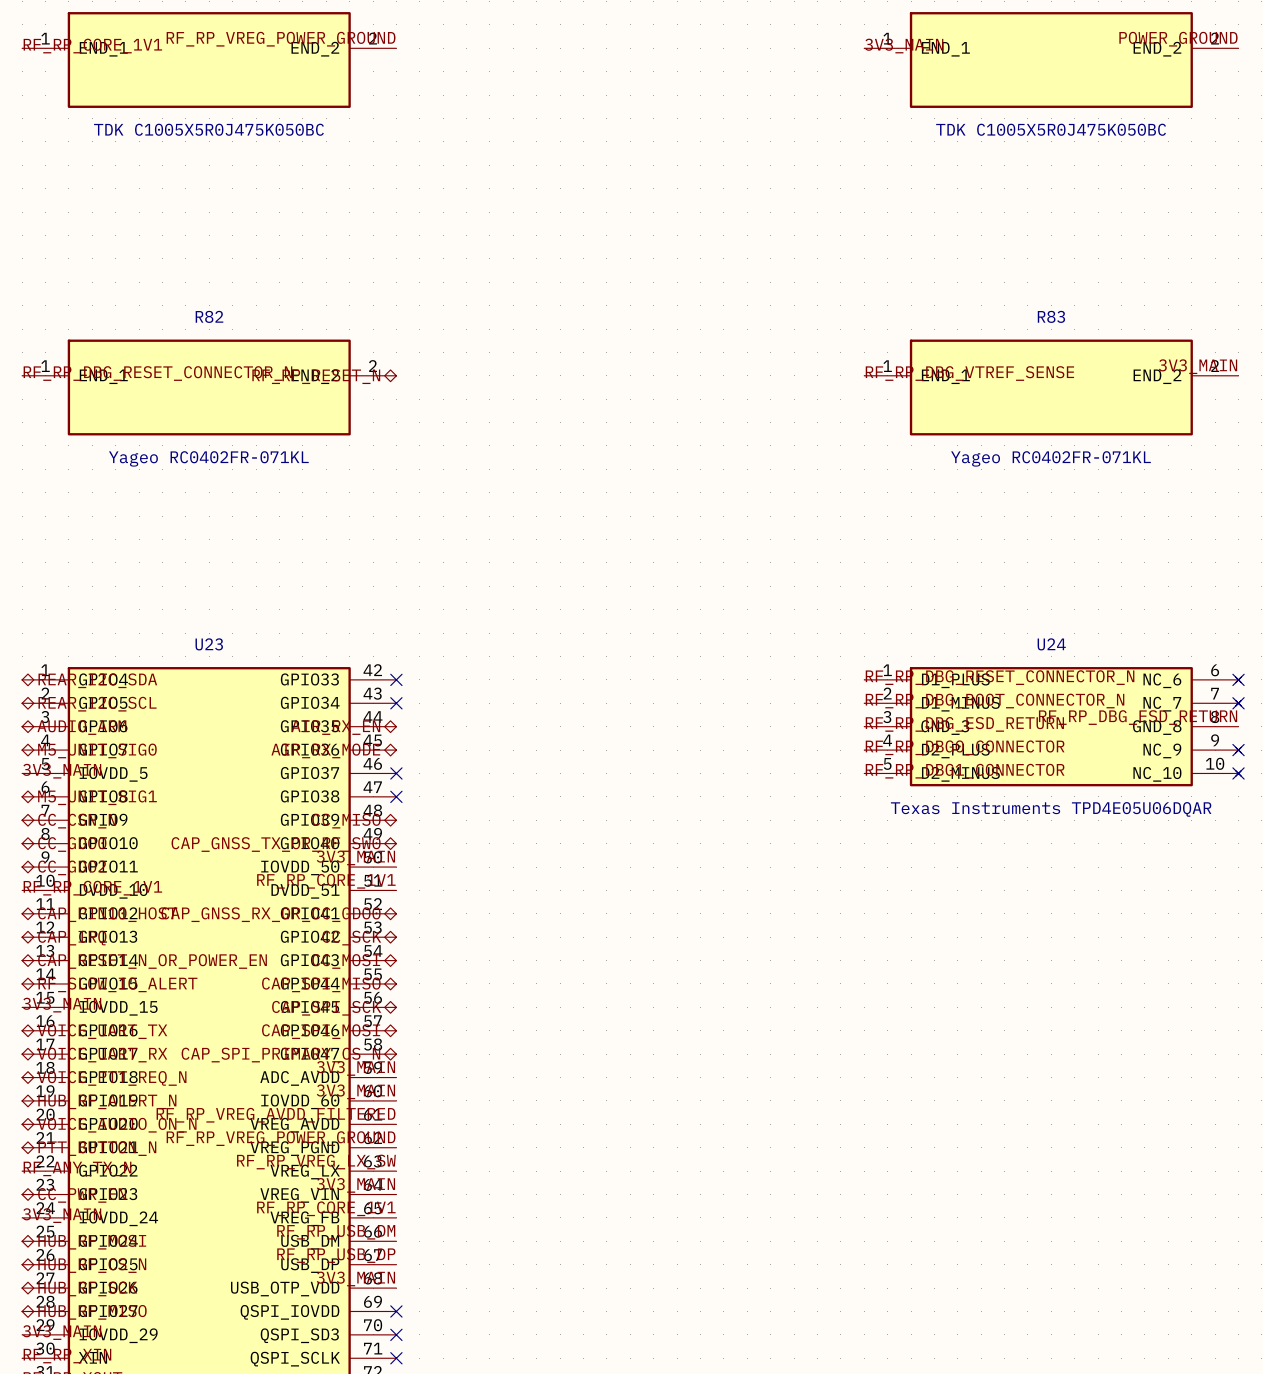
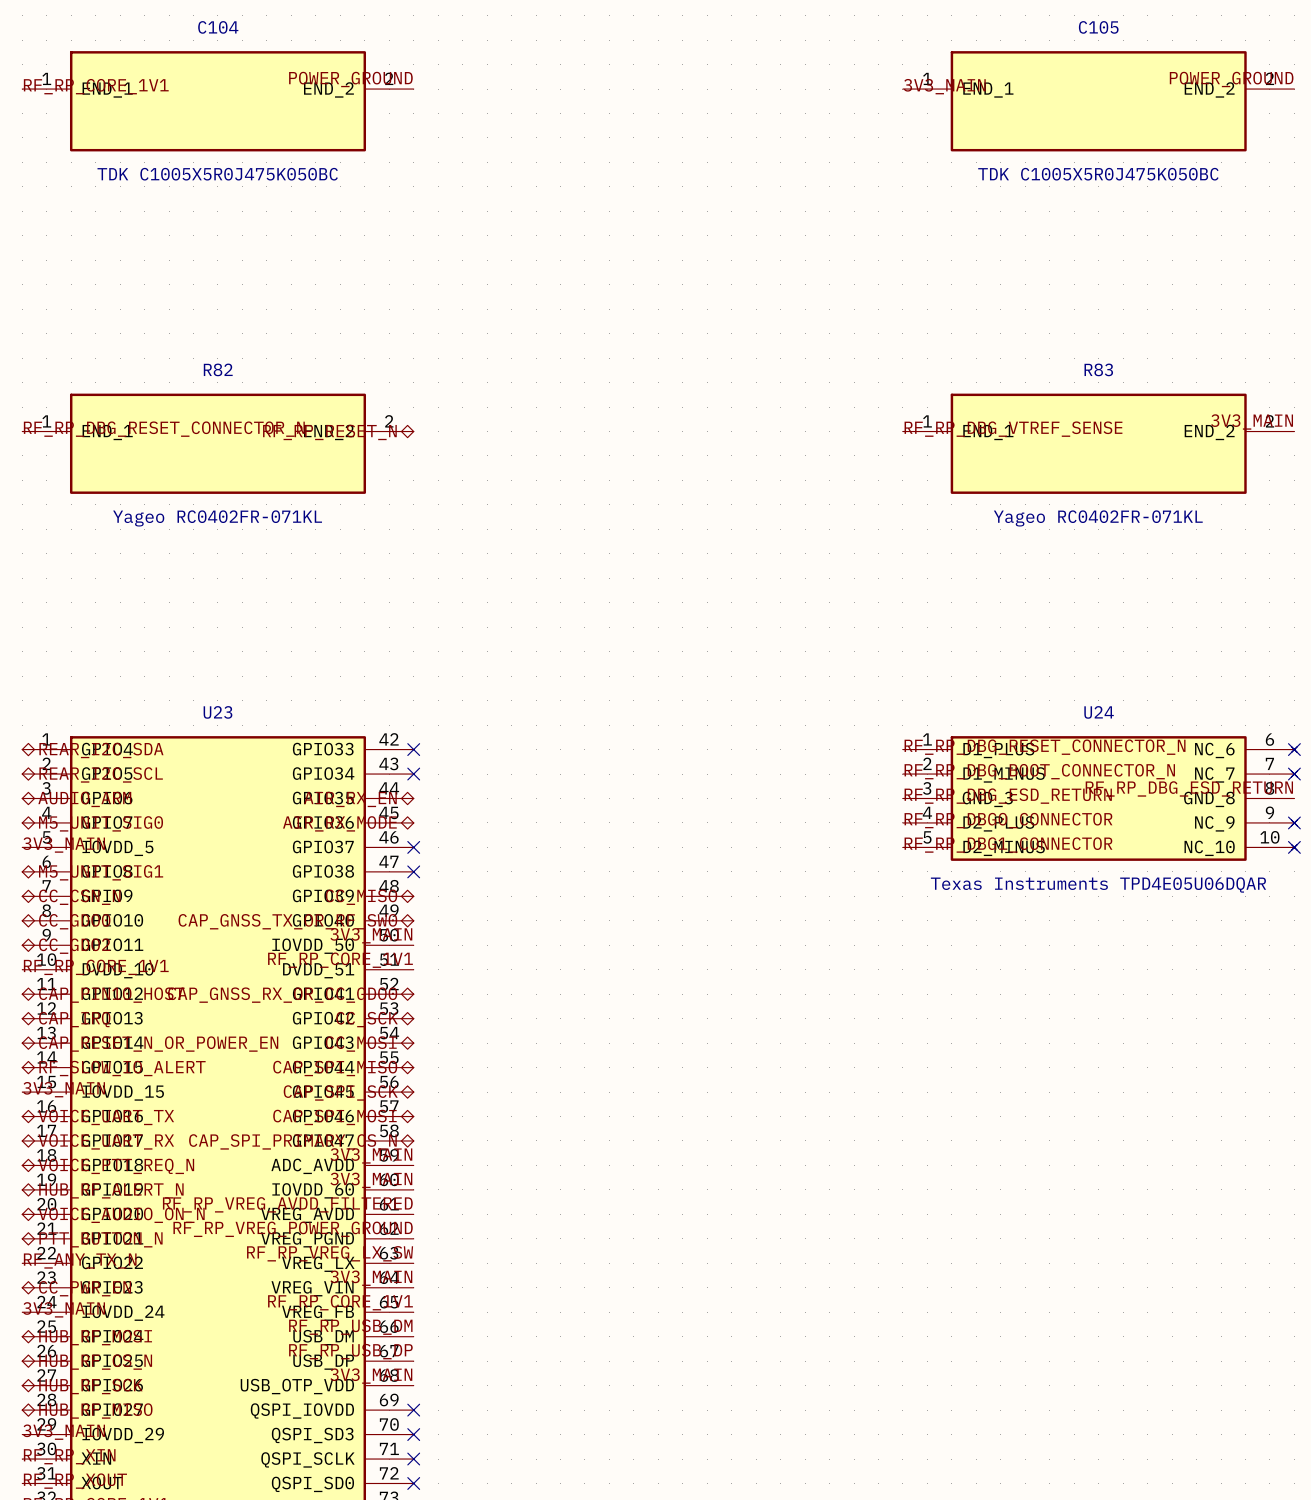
label: RF_RP_VREG_POWER_GROUND (281, 39) -> POWER_GROUND (350, 79)

